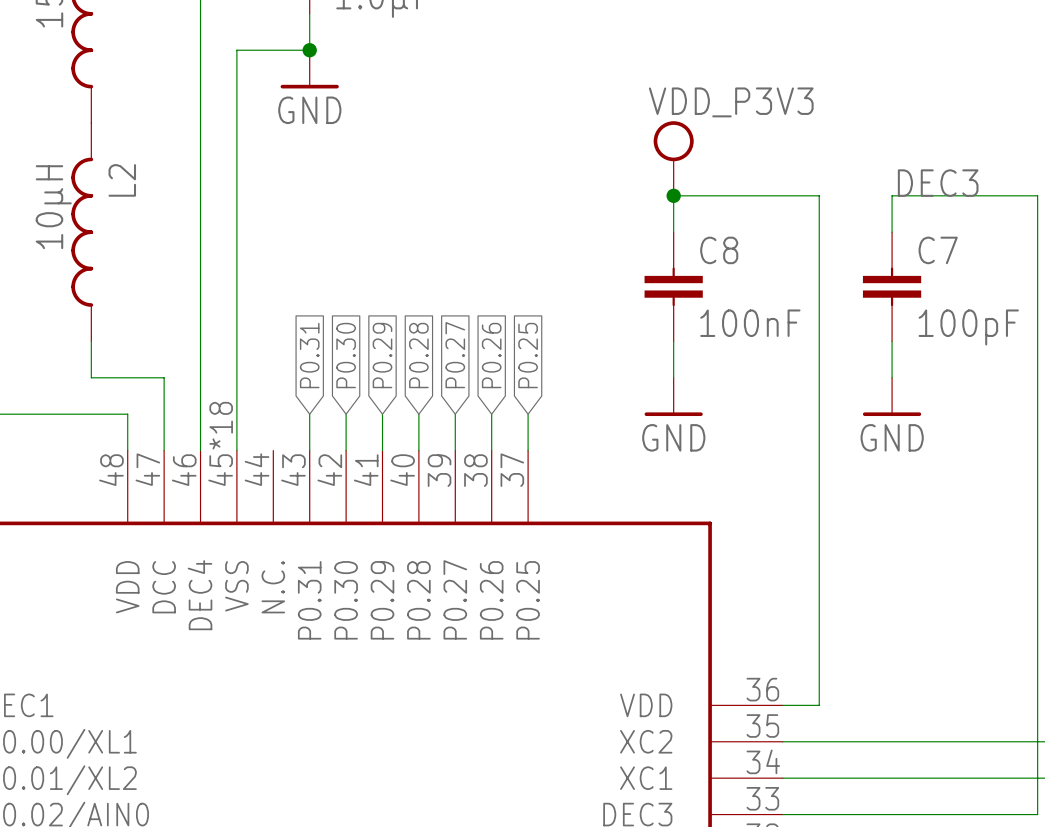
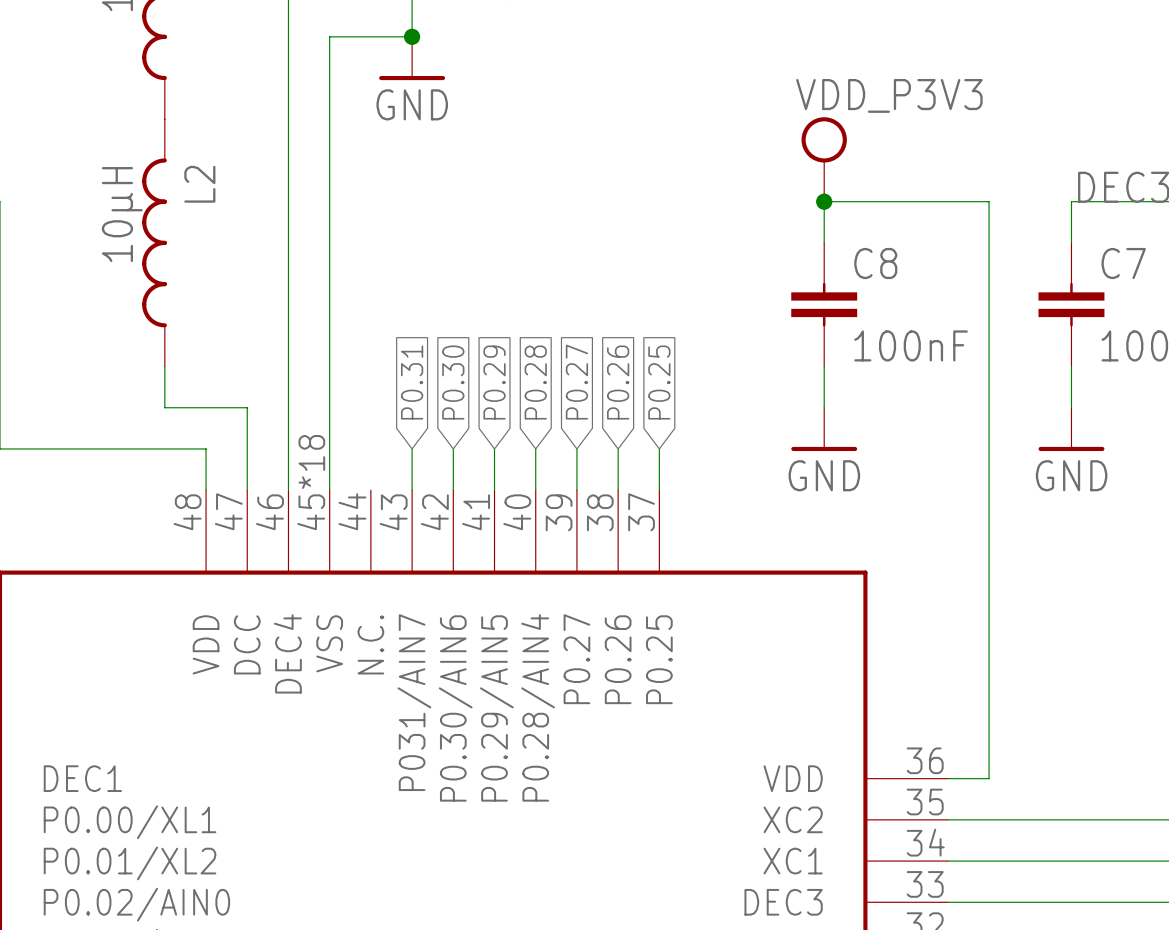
part pin name: P0.31 (309, 600) -> P031/AIN7 (414, 702)
part pin name: P0.30 (346, 600) -> P0.30/AIN6 (455, 708)
part pin name: P0.29 (382, 600) -> P0.29/AIN5 (496, 708)
part pin name: P0.28 (418, 600) -> P0.28/AIN4 (538, 707)

